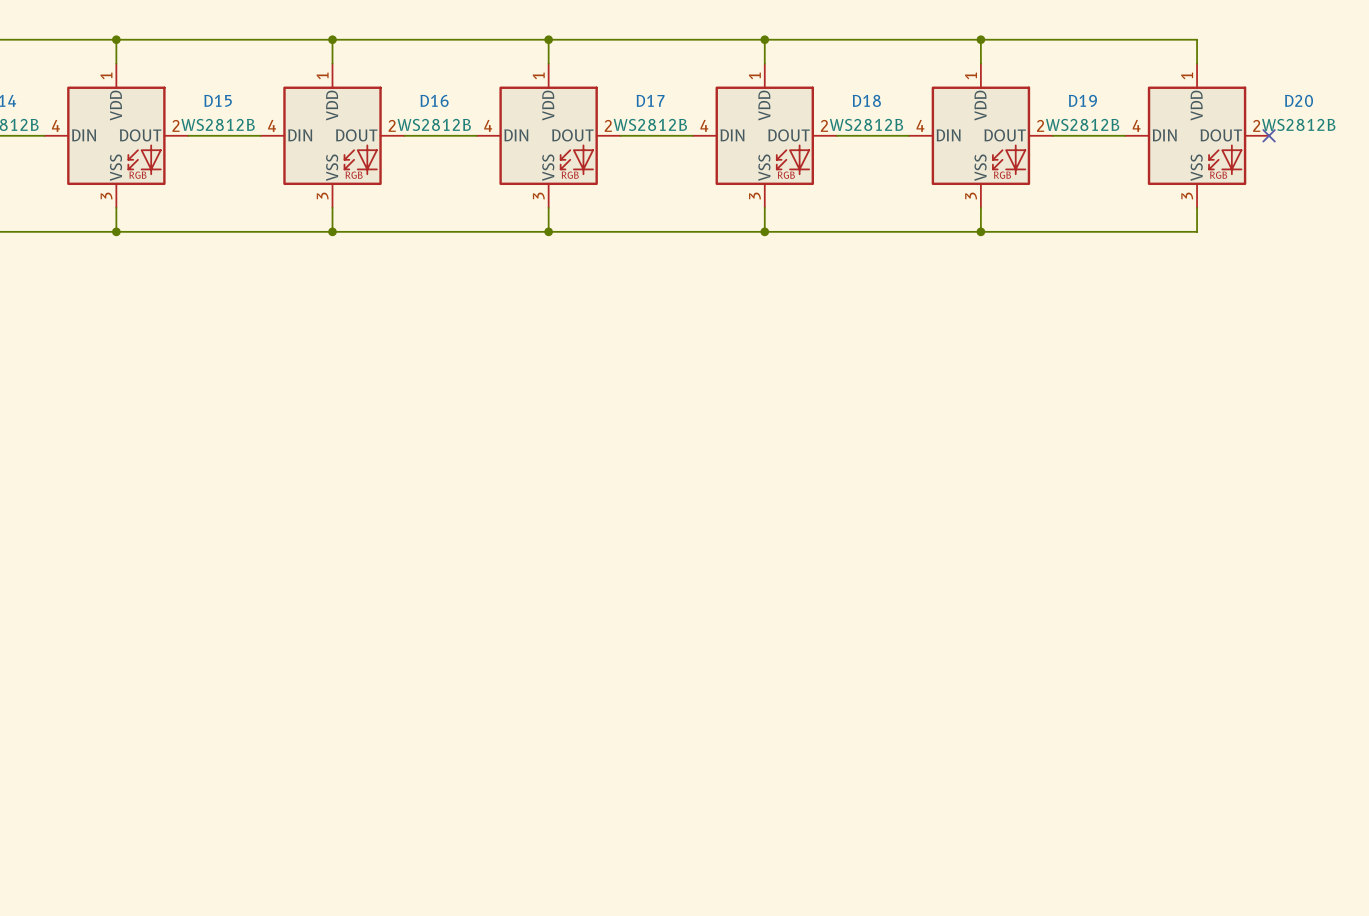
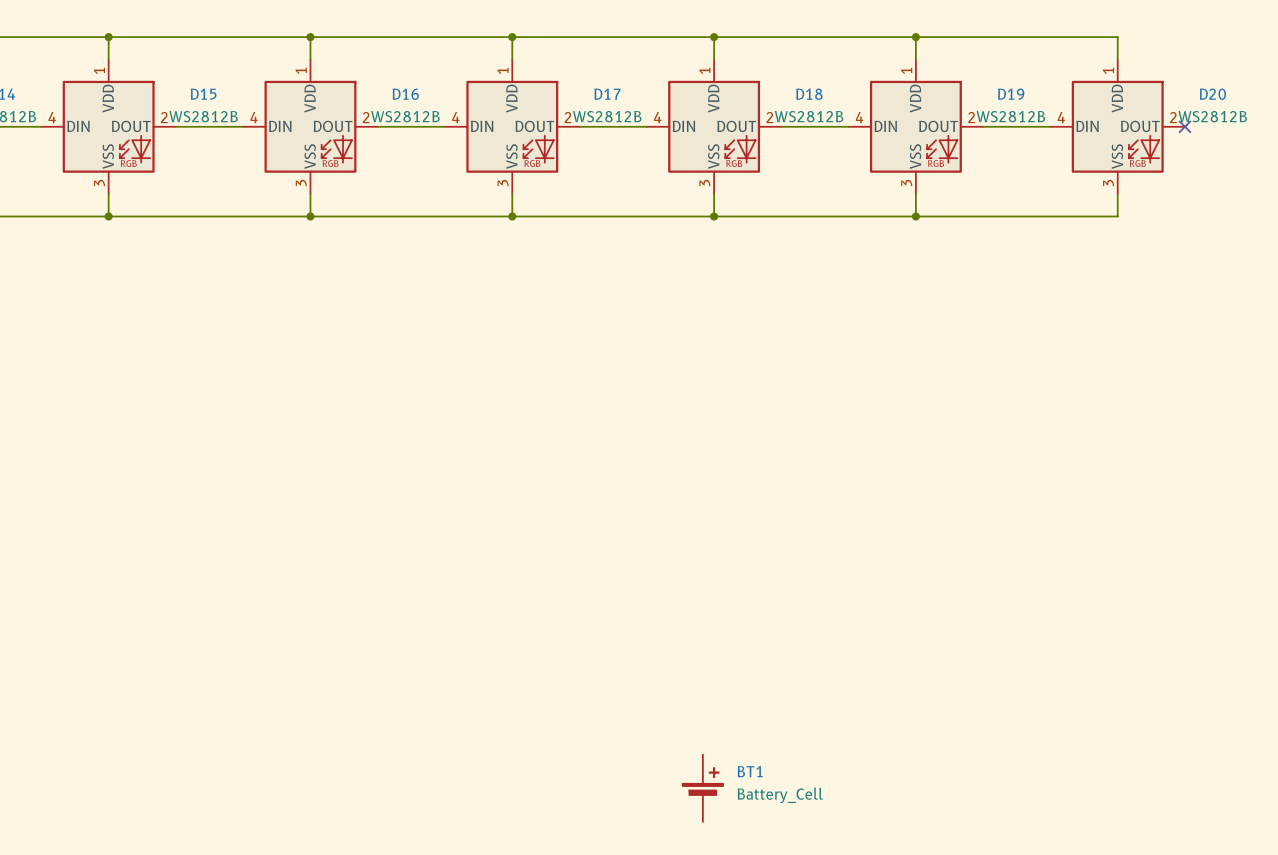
BT1: none -> Battery_Cell (702, 788)

